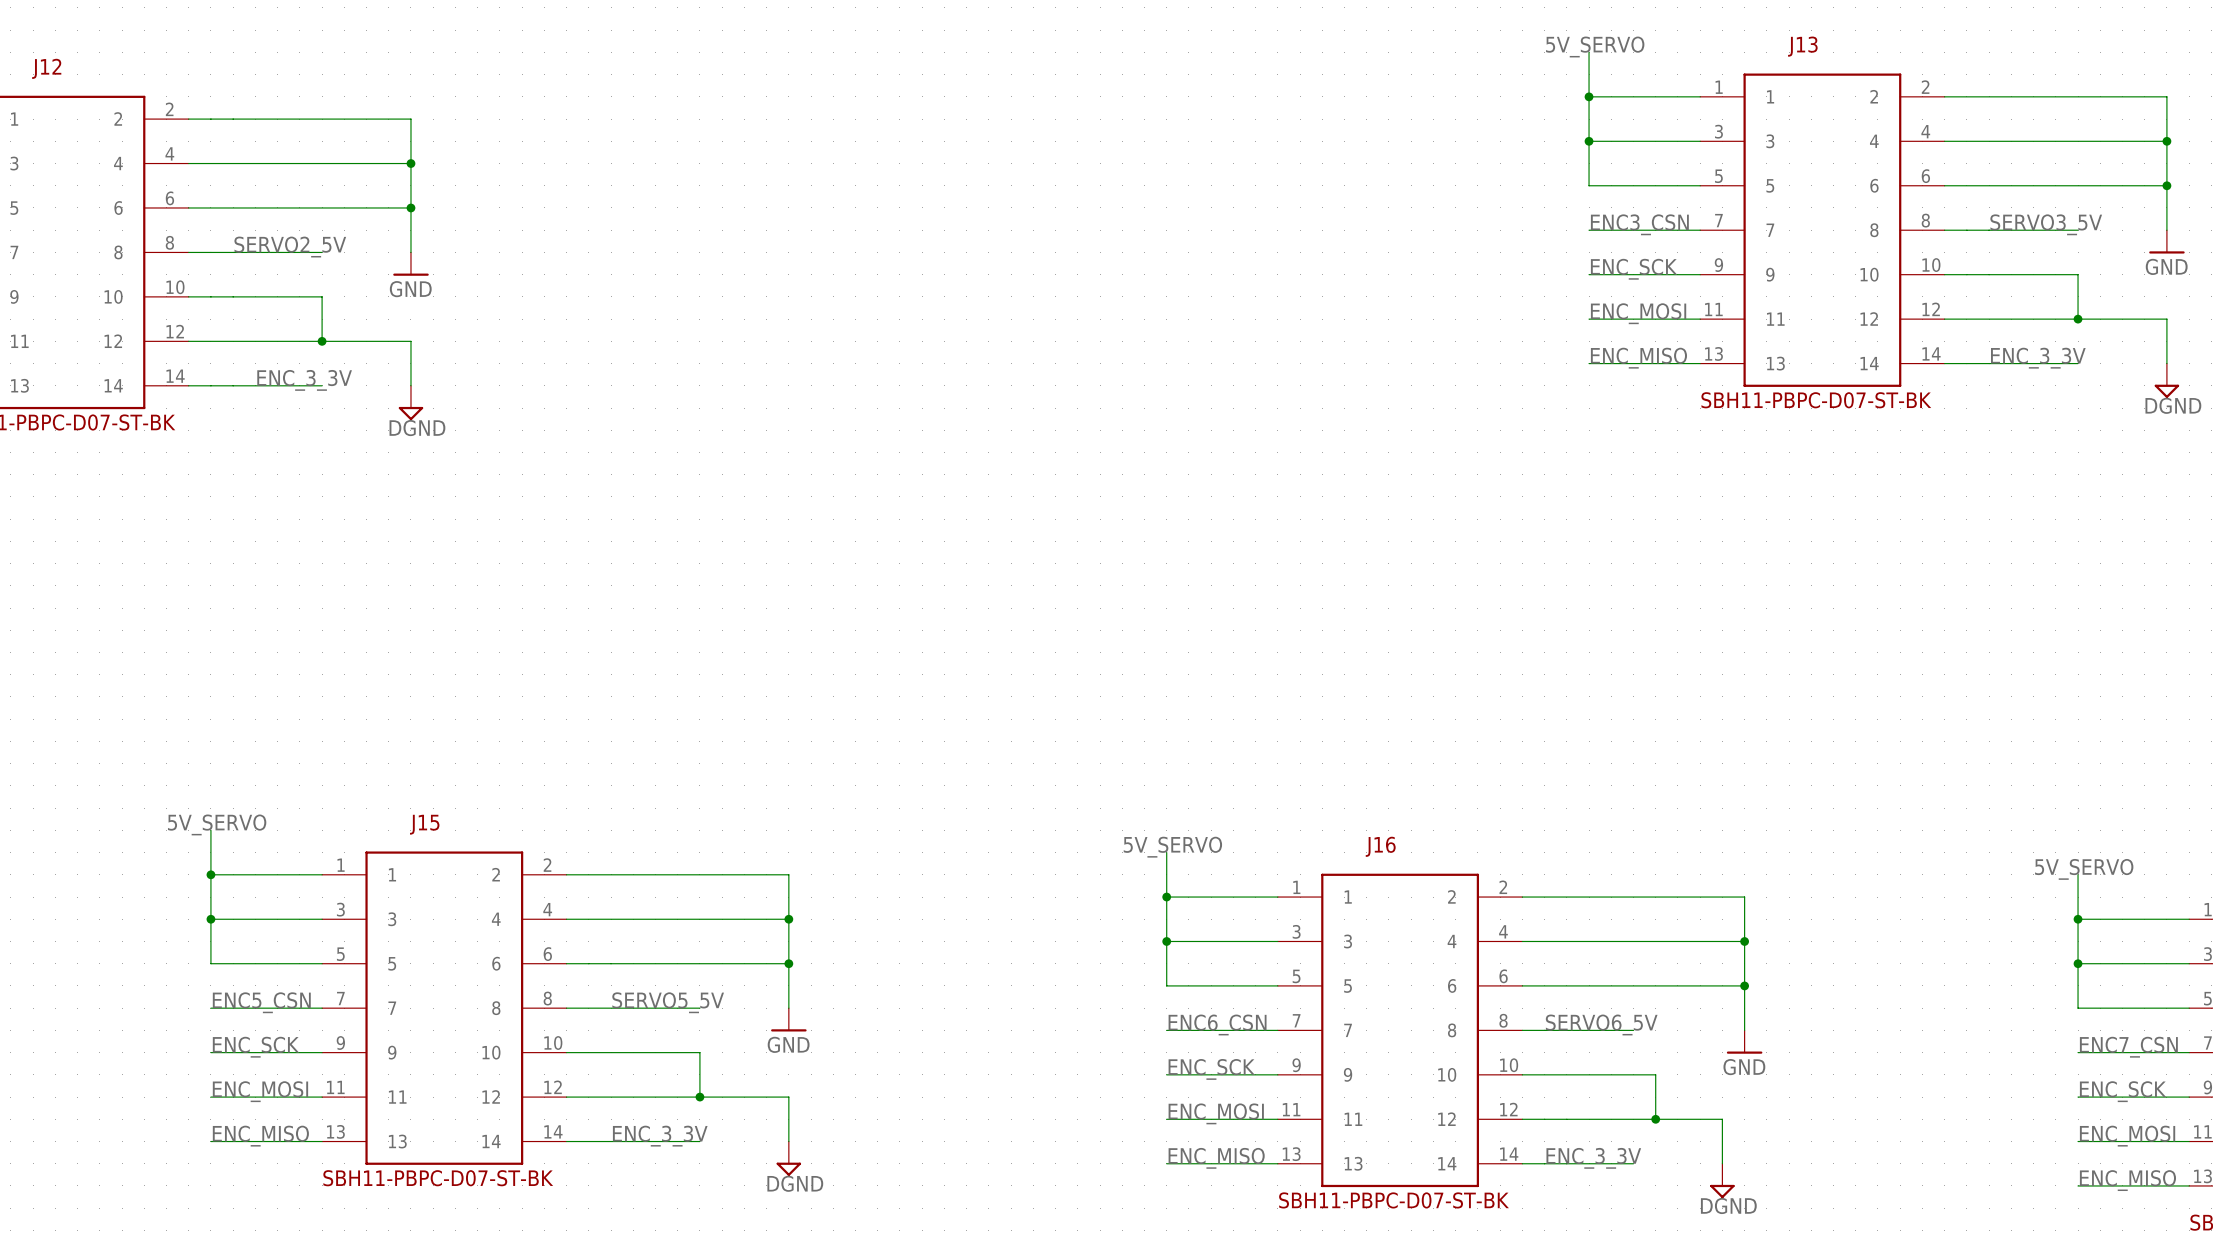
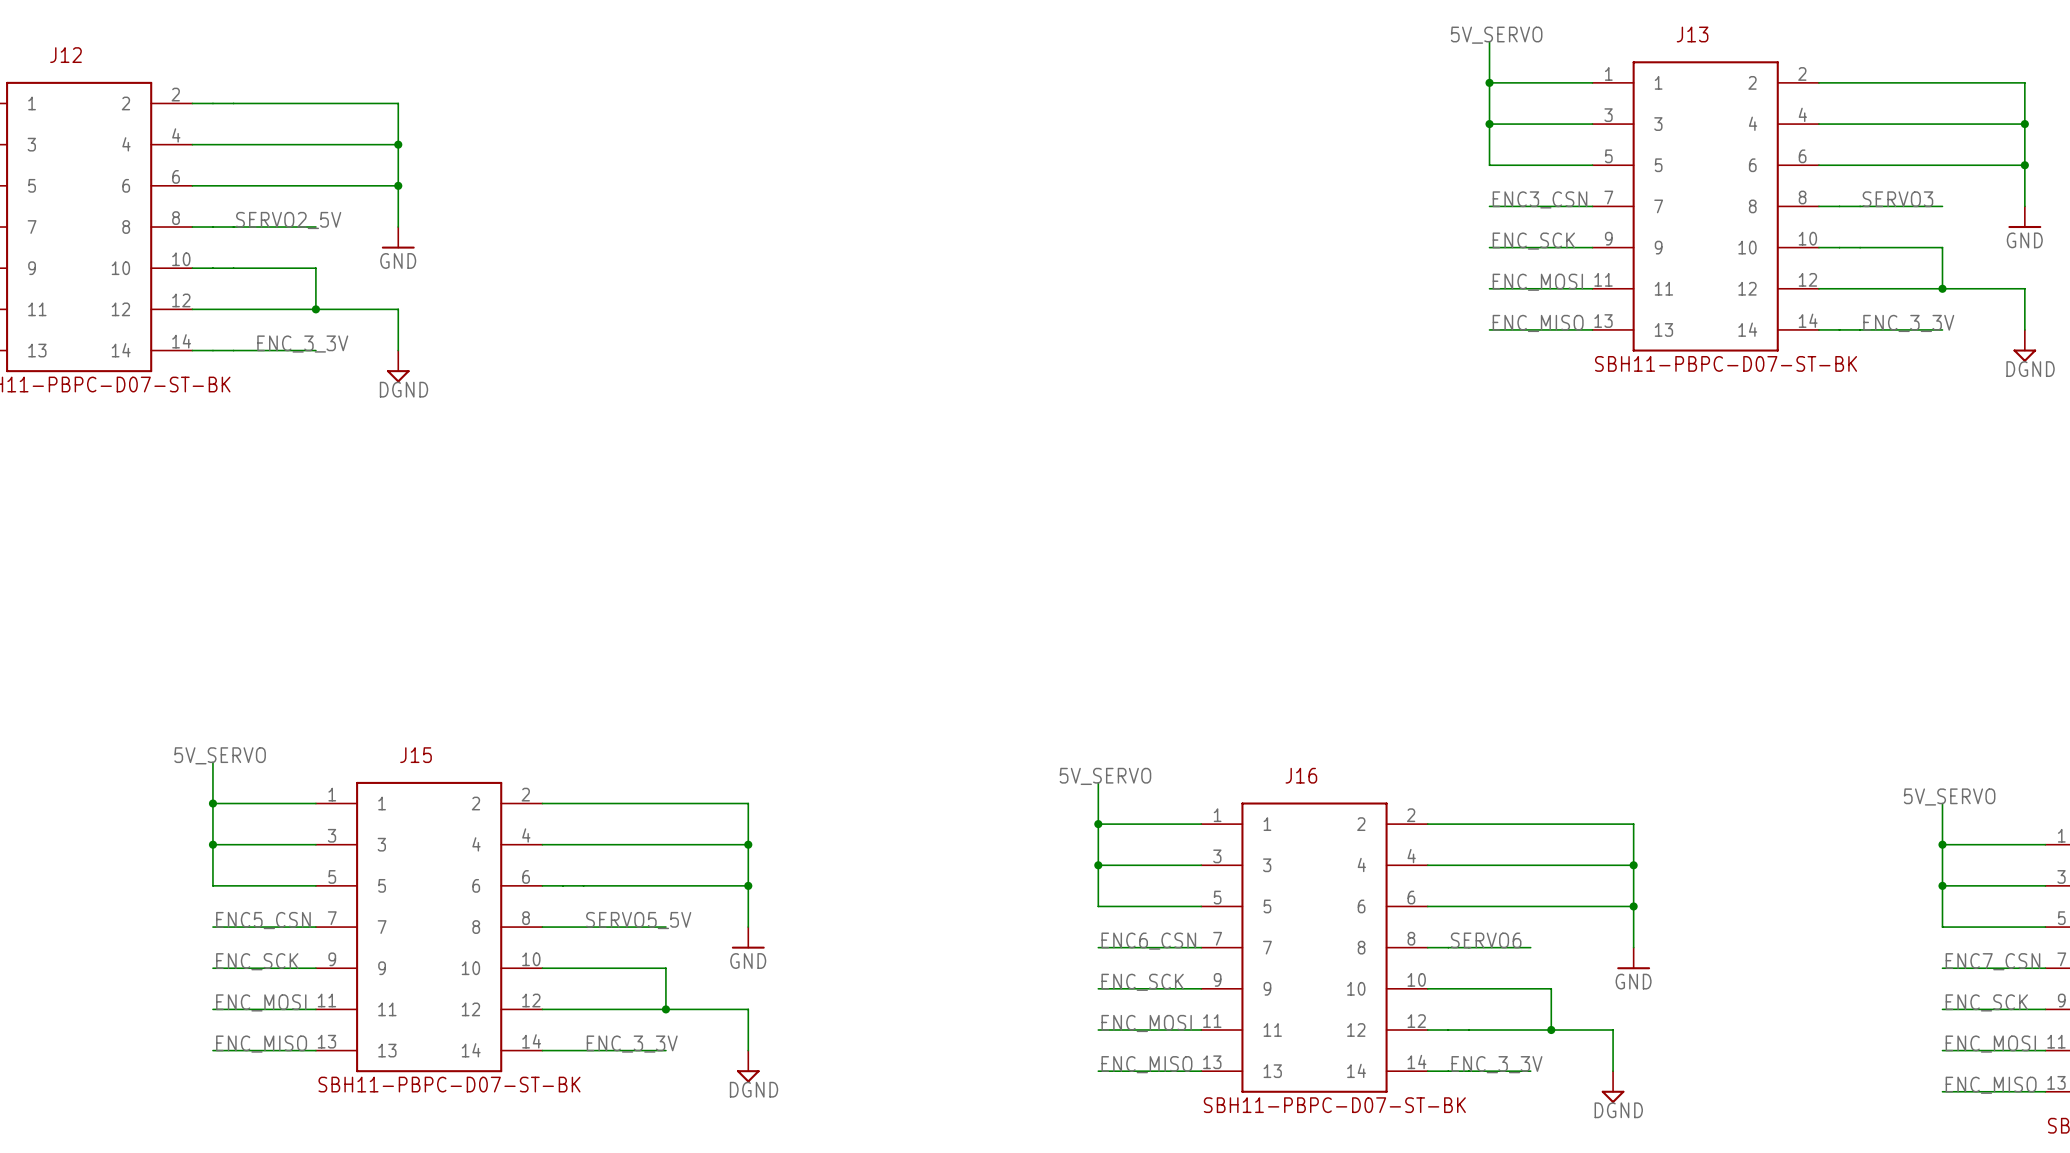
label: SERVO3_5V (2046, 224) -> SERVO3 (1897, 199)
label: SERVO6_5V (1601, 1024) -> SERVO6 (1486, 940)

